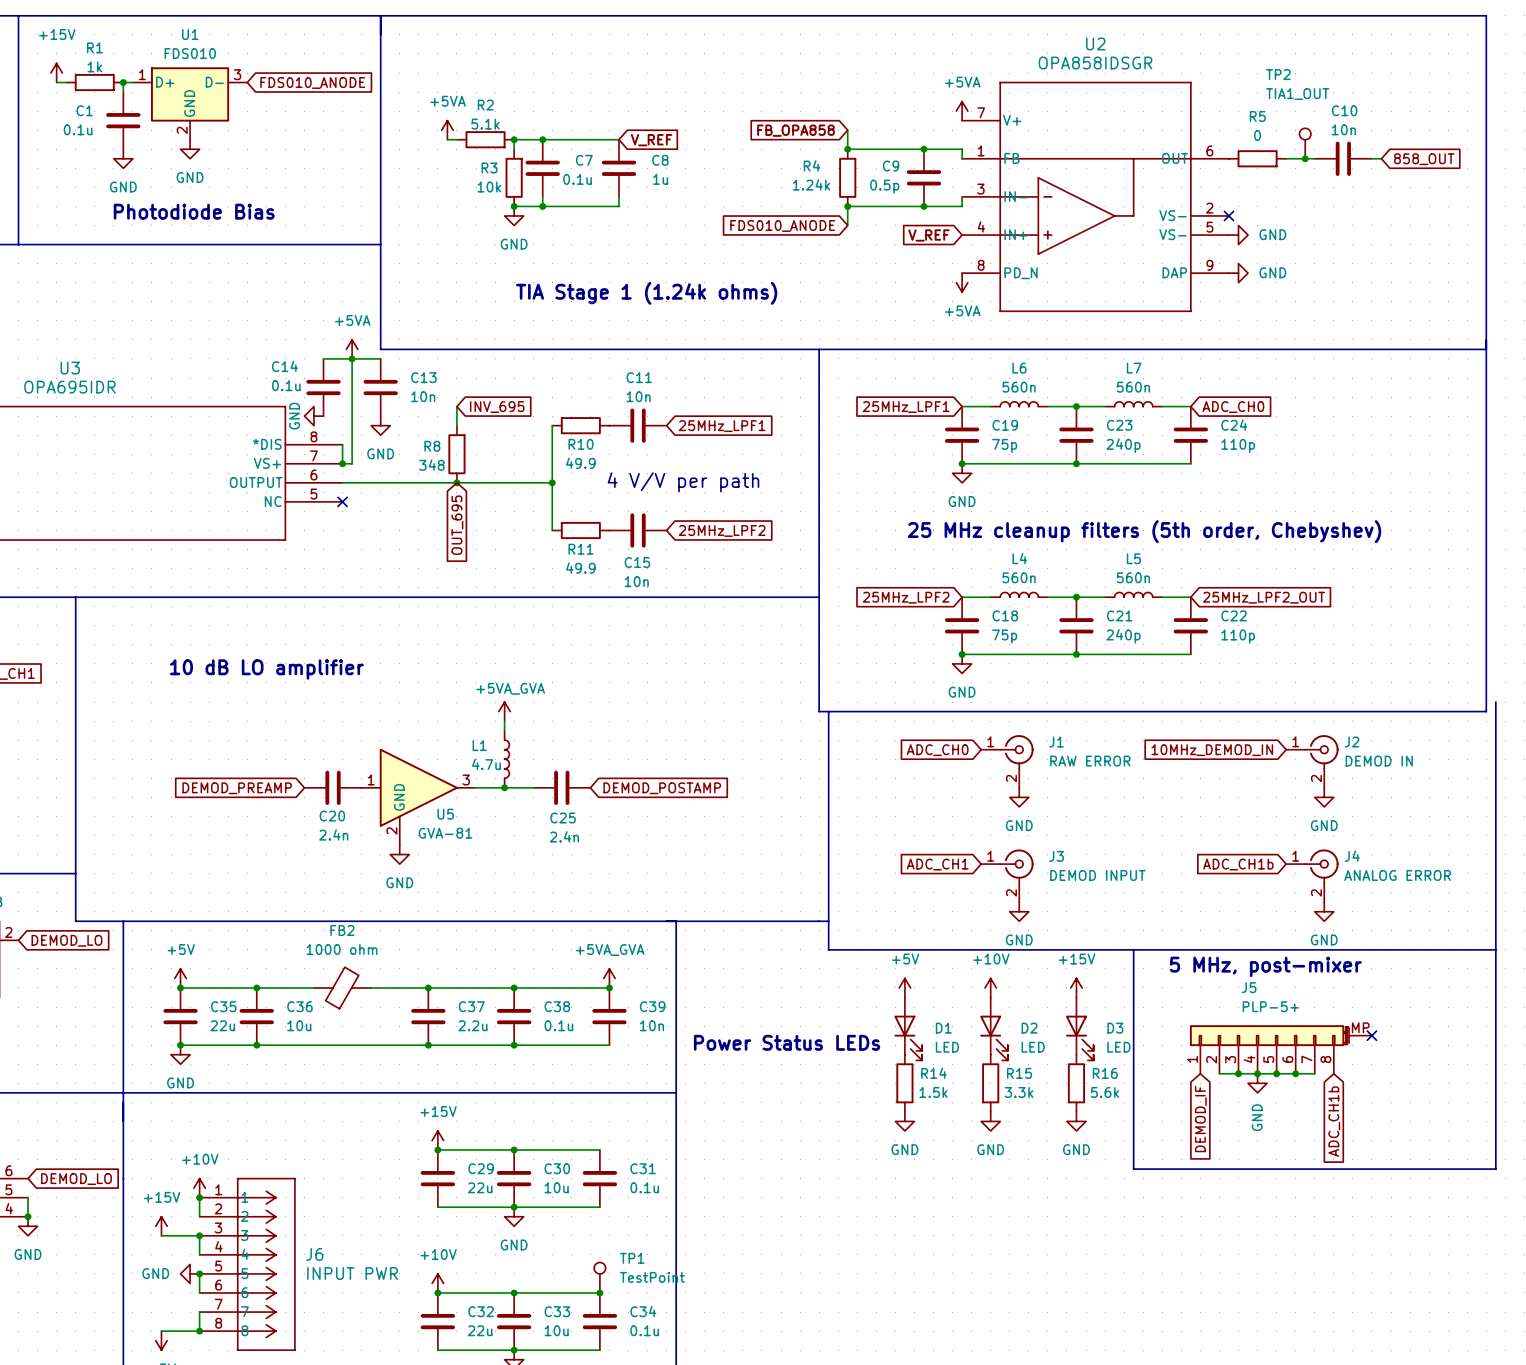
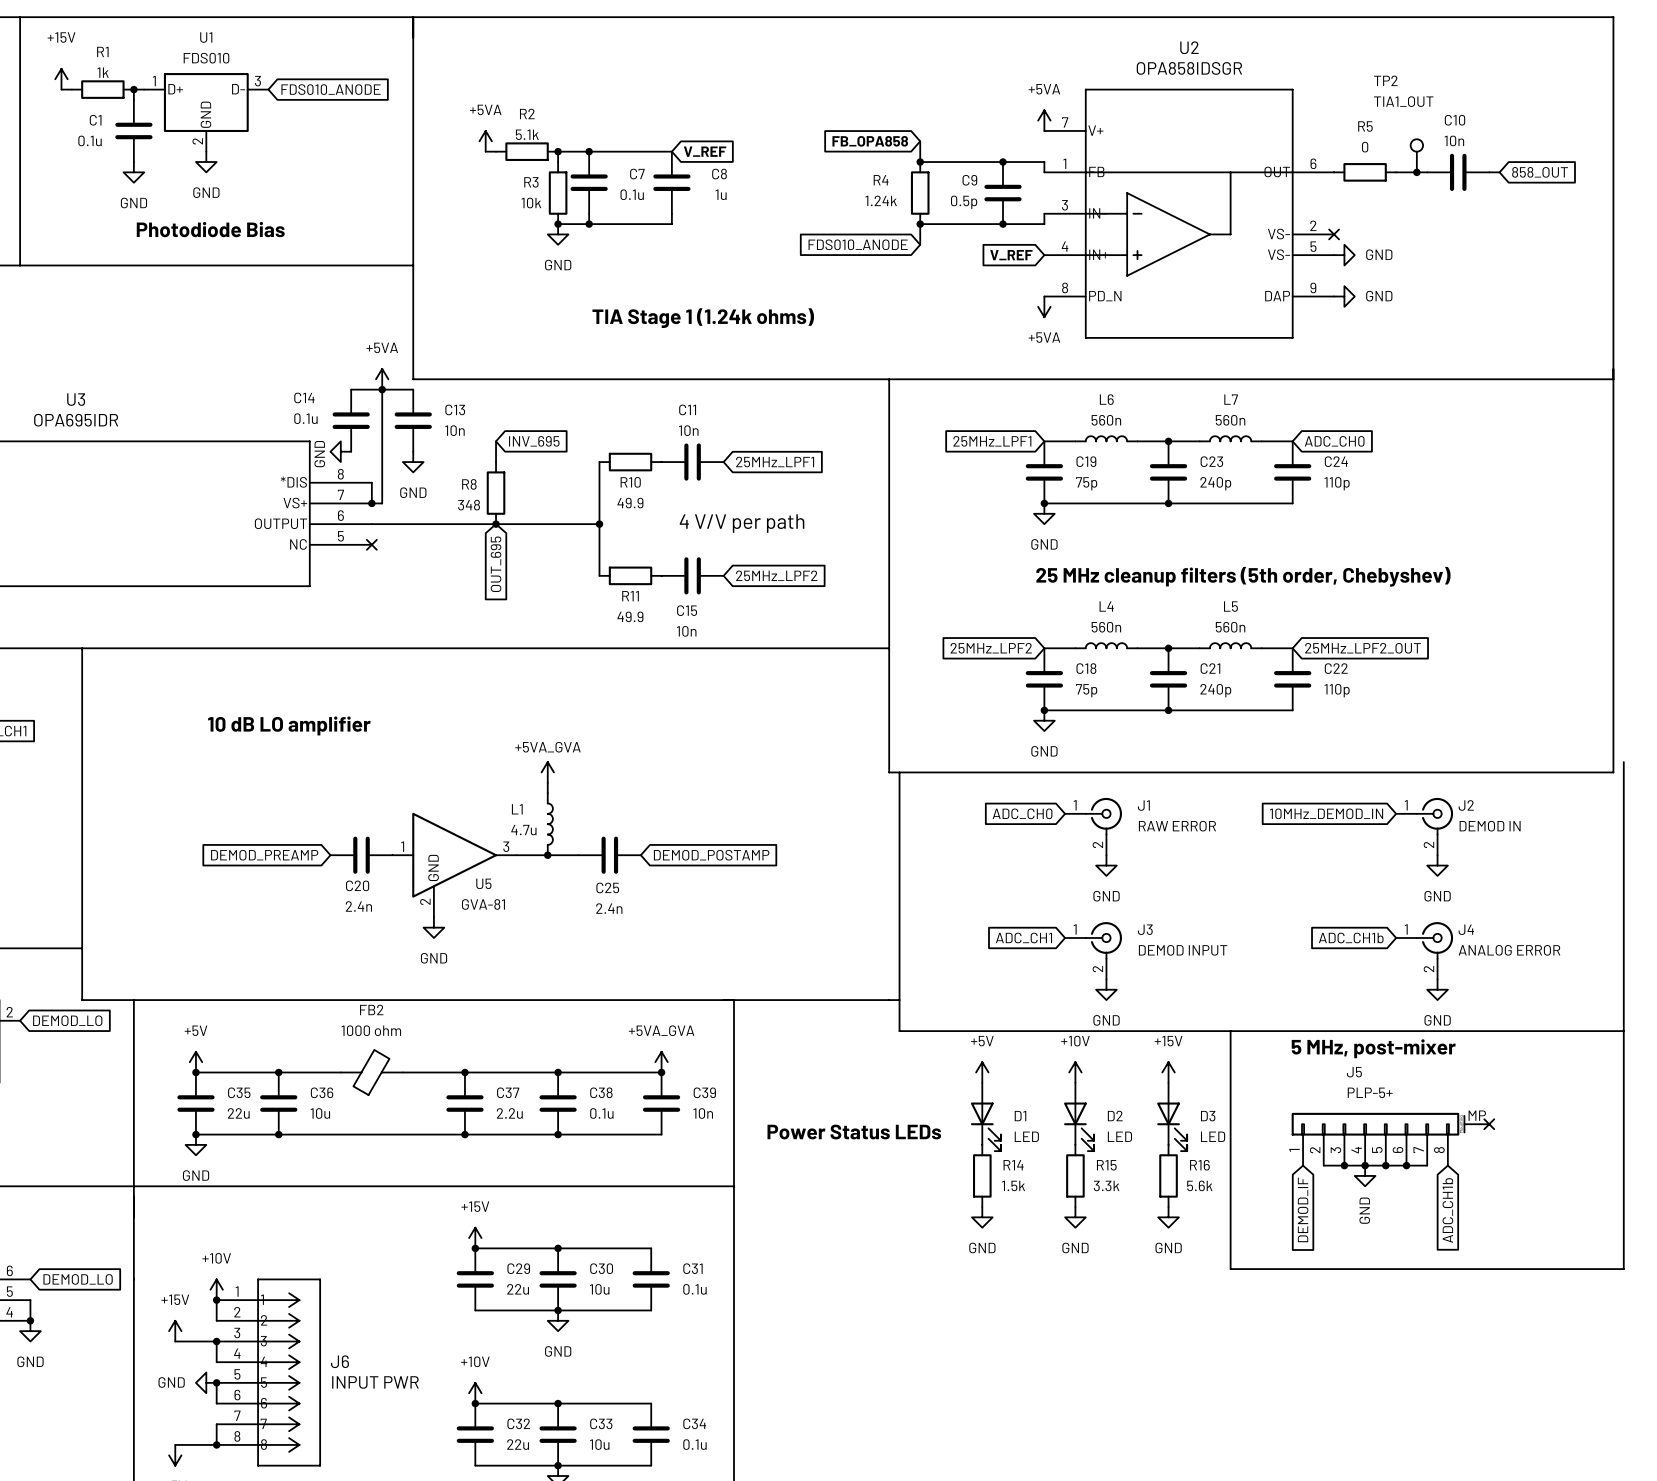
TP1: TestPoint (599, 1277) -> none
junction: (599, 1292) -> none

